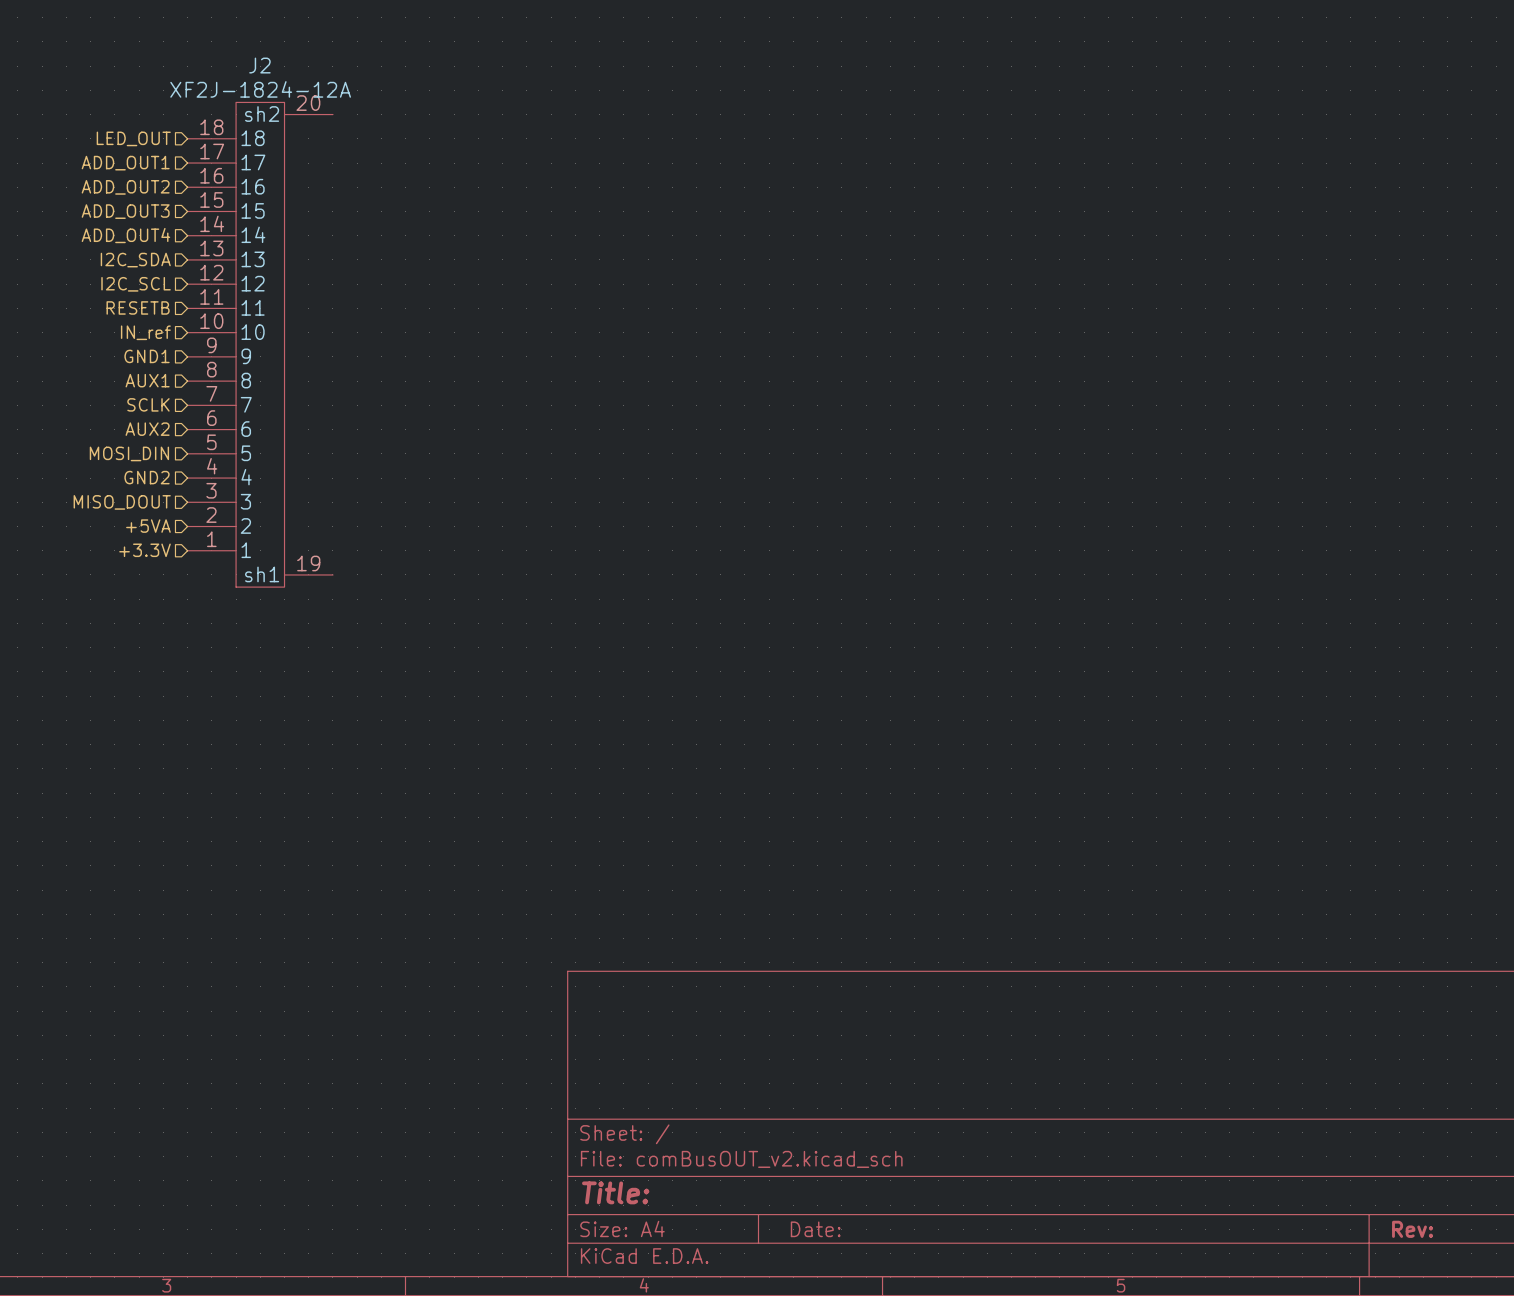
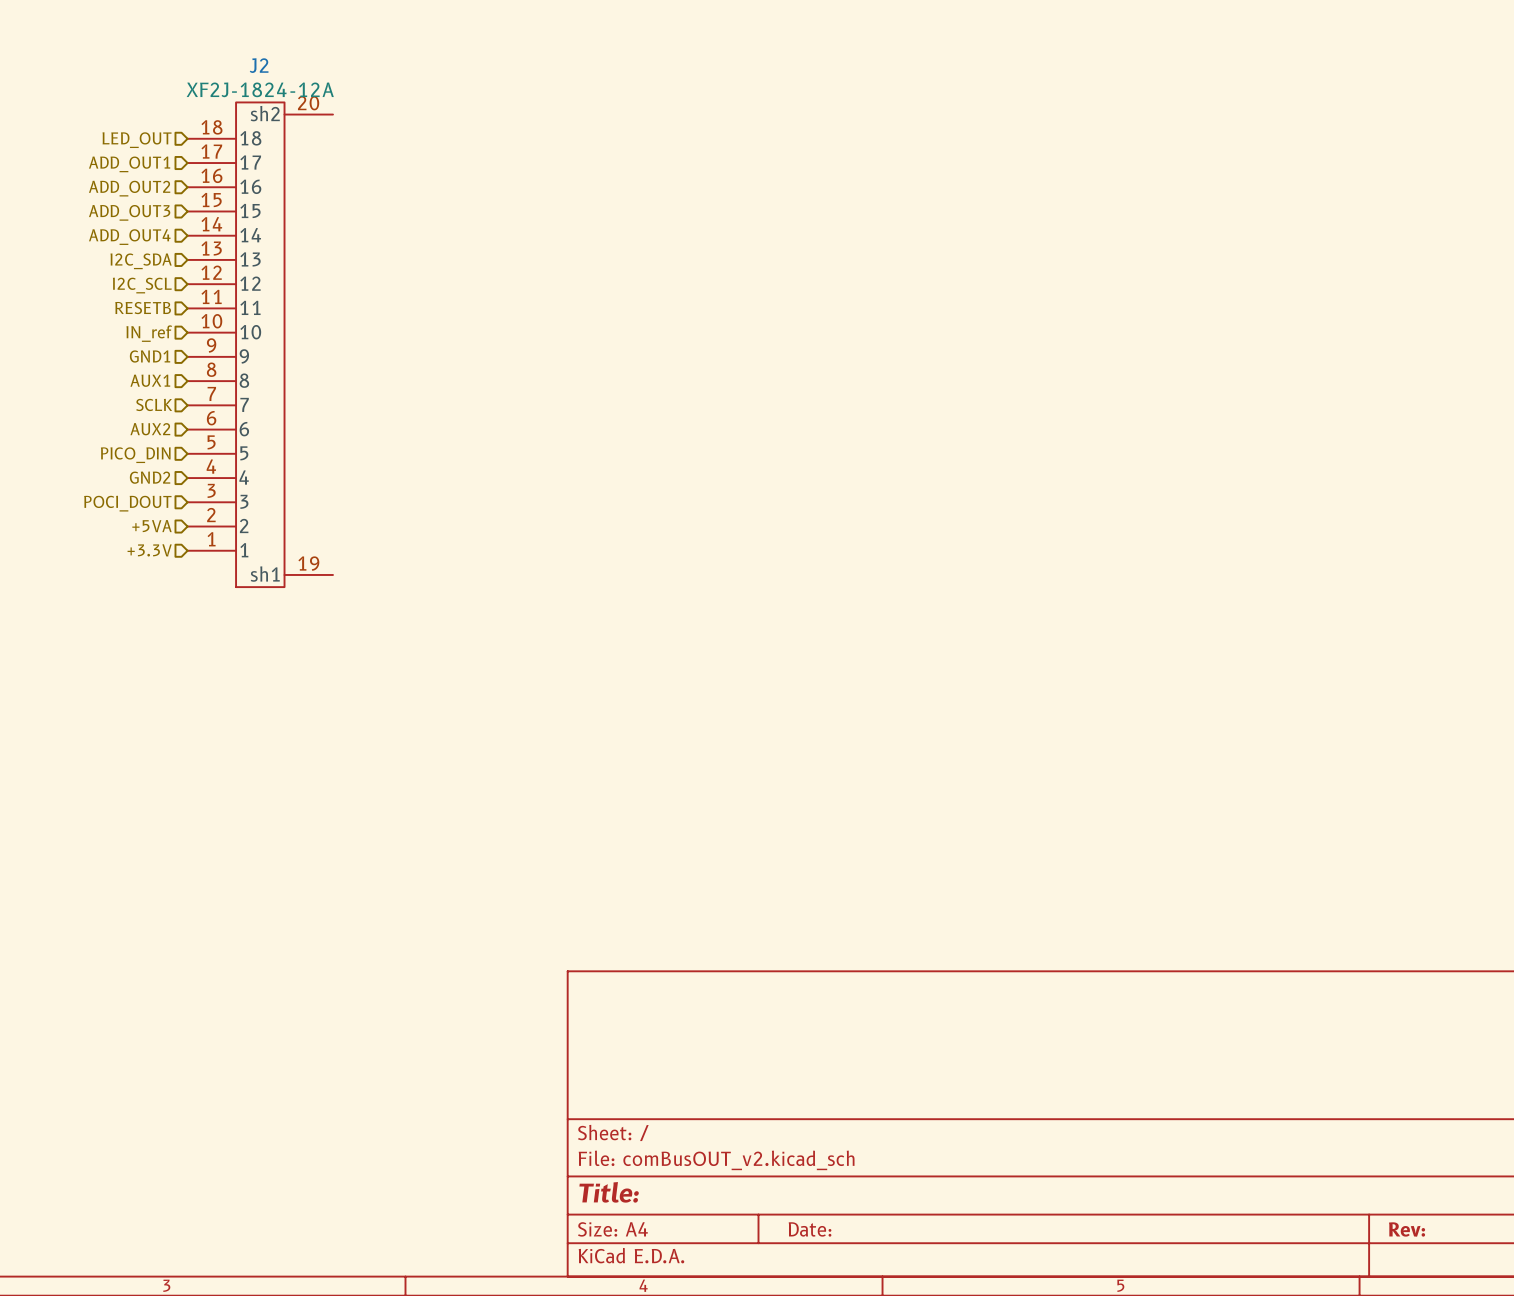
hierarchical label: MOSI_DIN (129, 453) -> PICO_DIN (135, 455)
hierarchical label: MISO_DOUT (122, 502) -> POCI_DOUT (127, 503)

